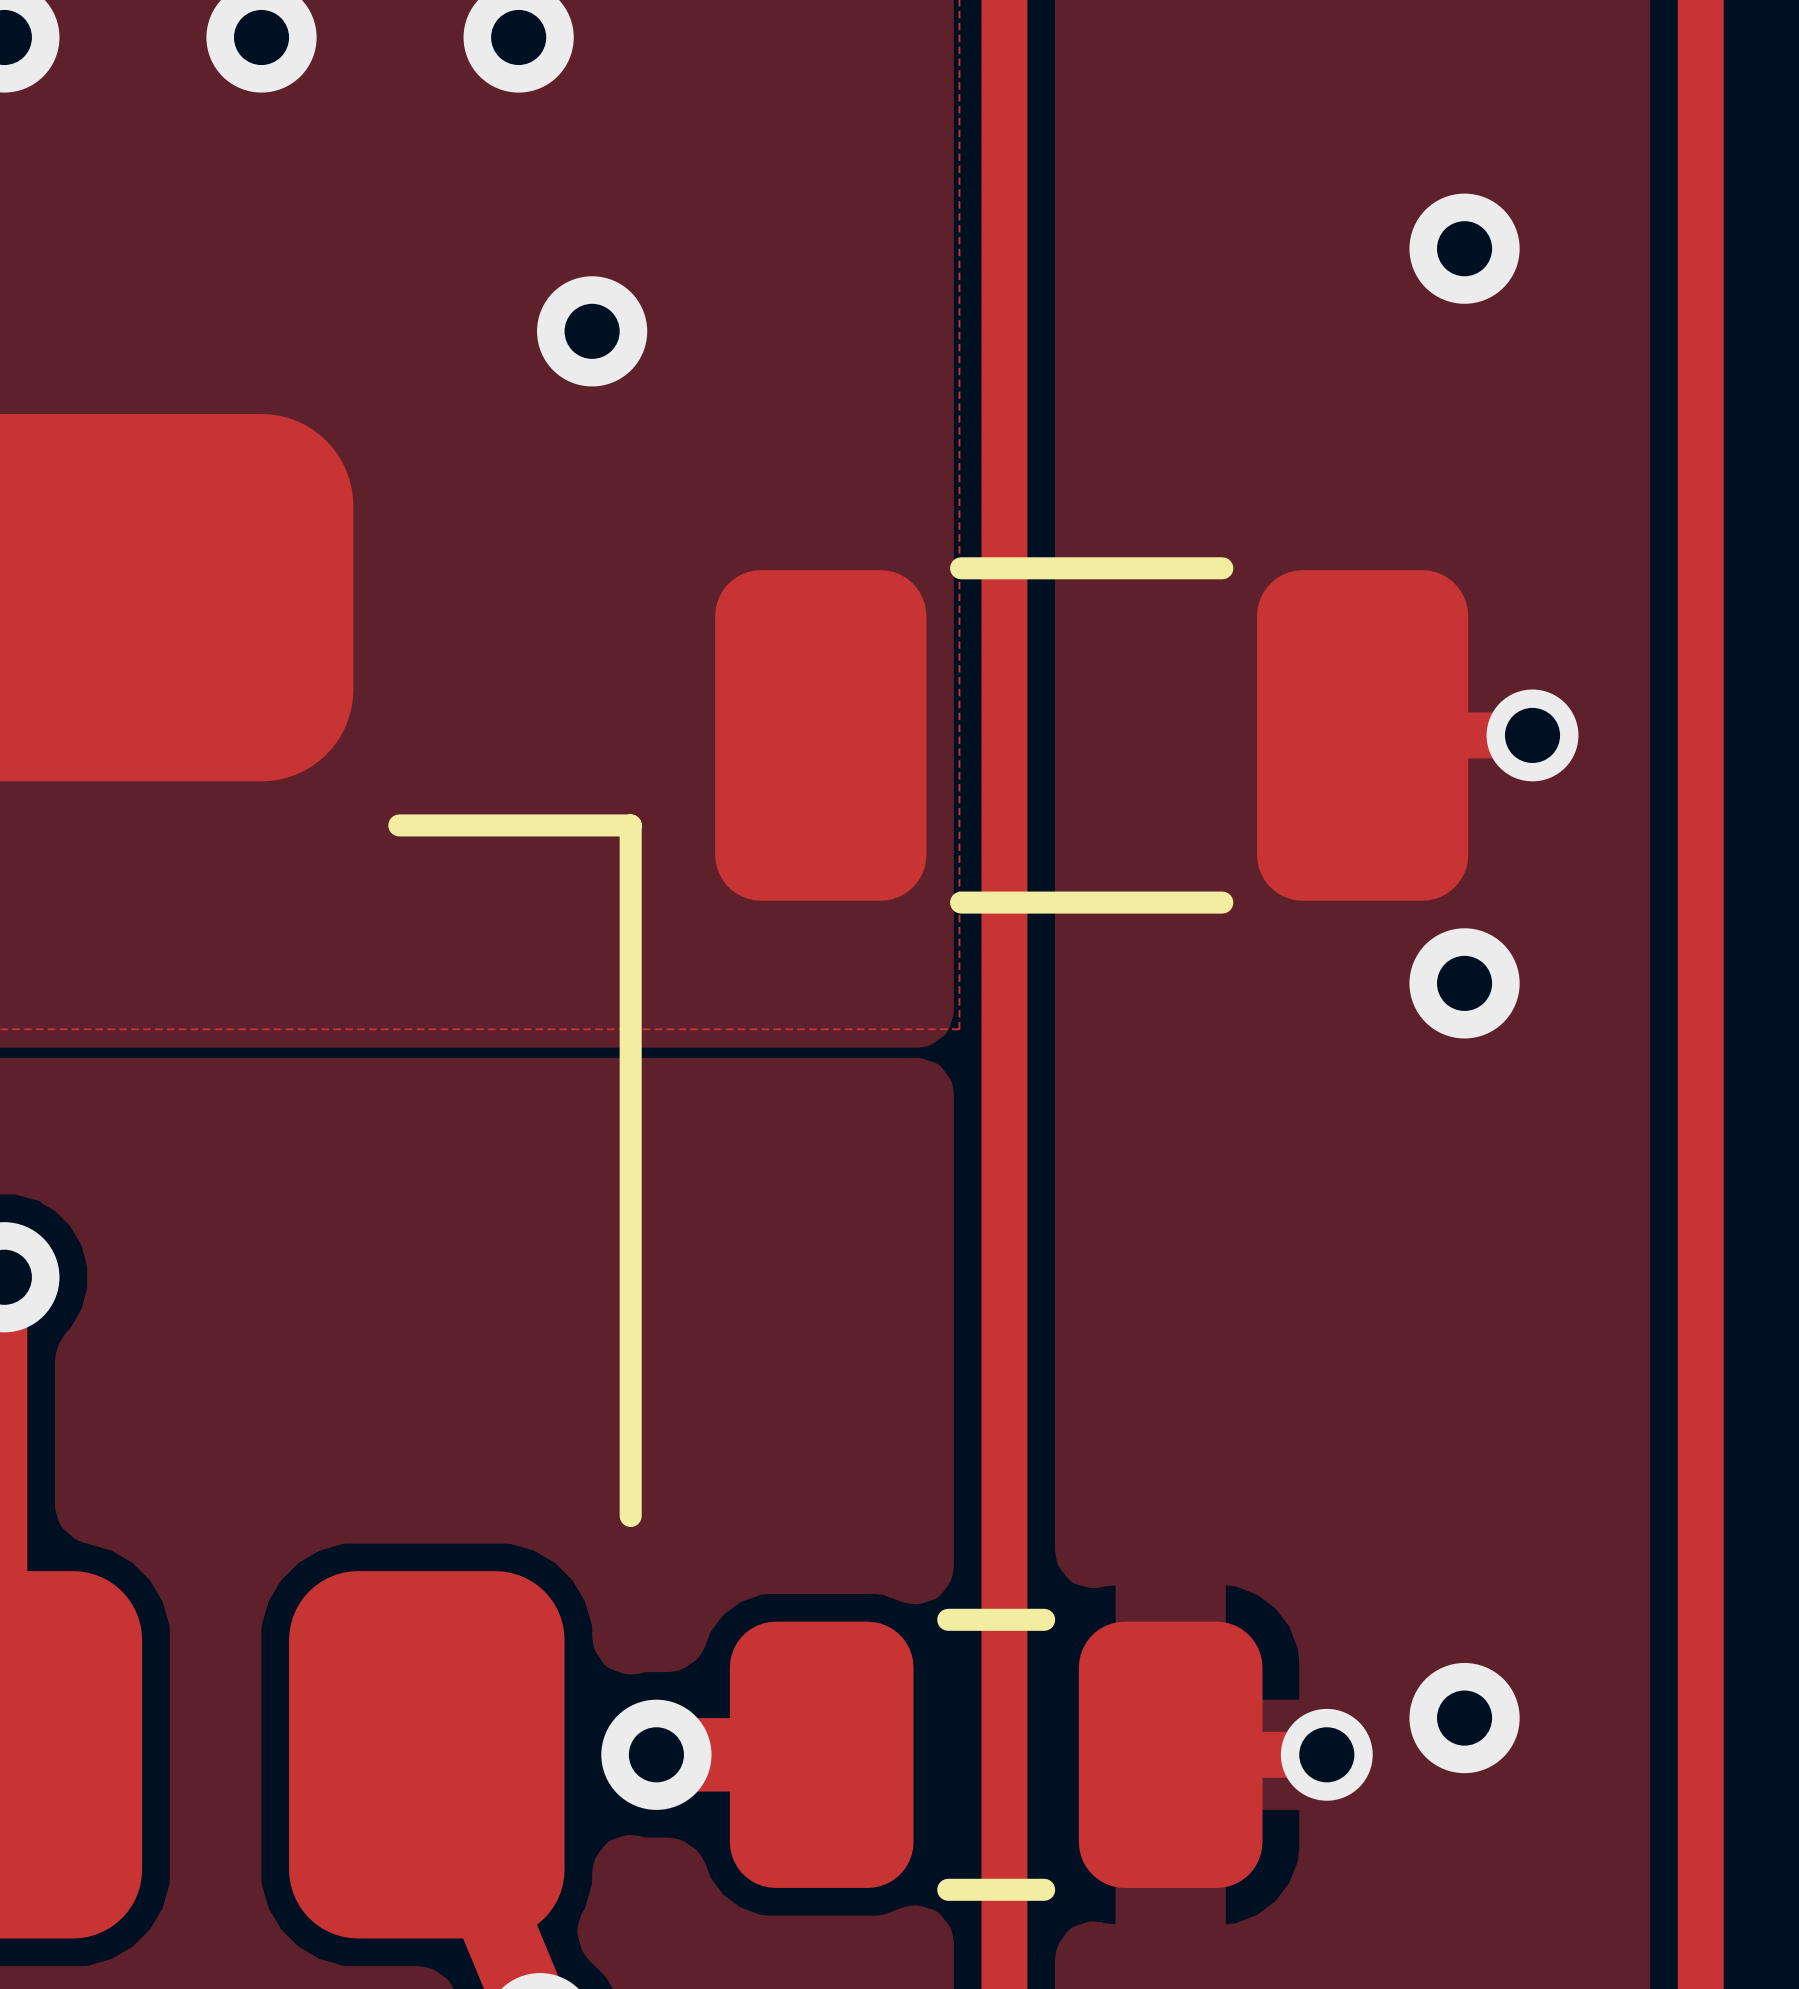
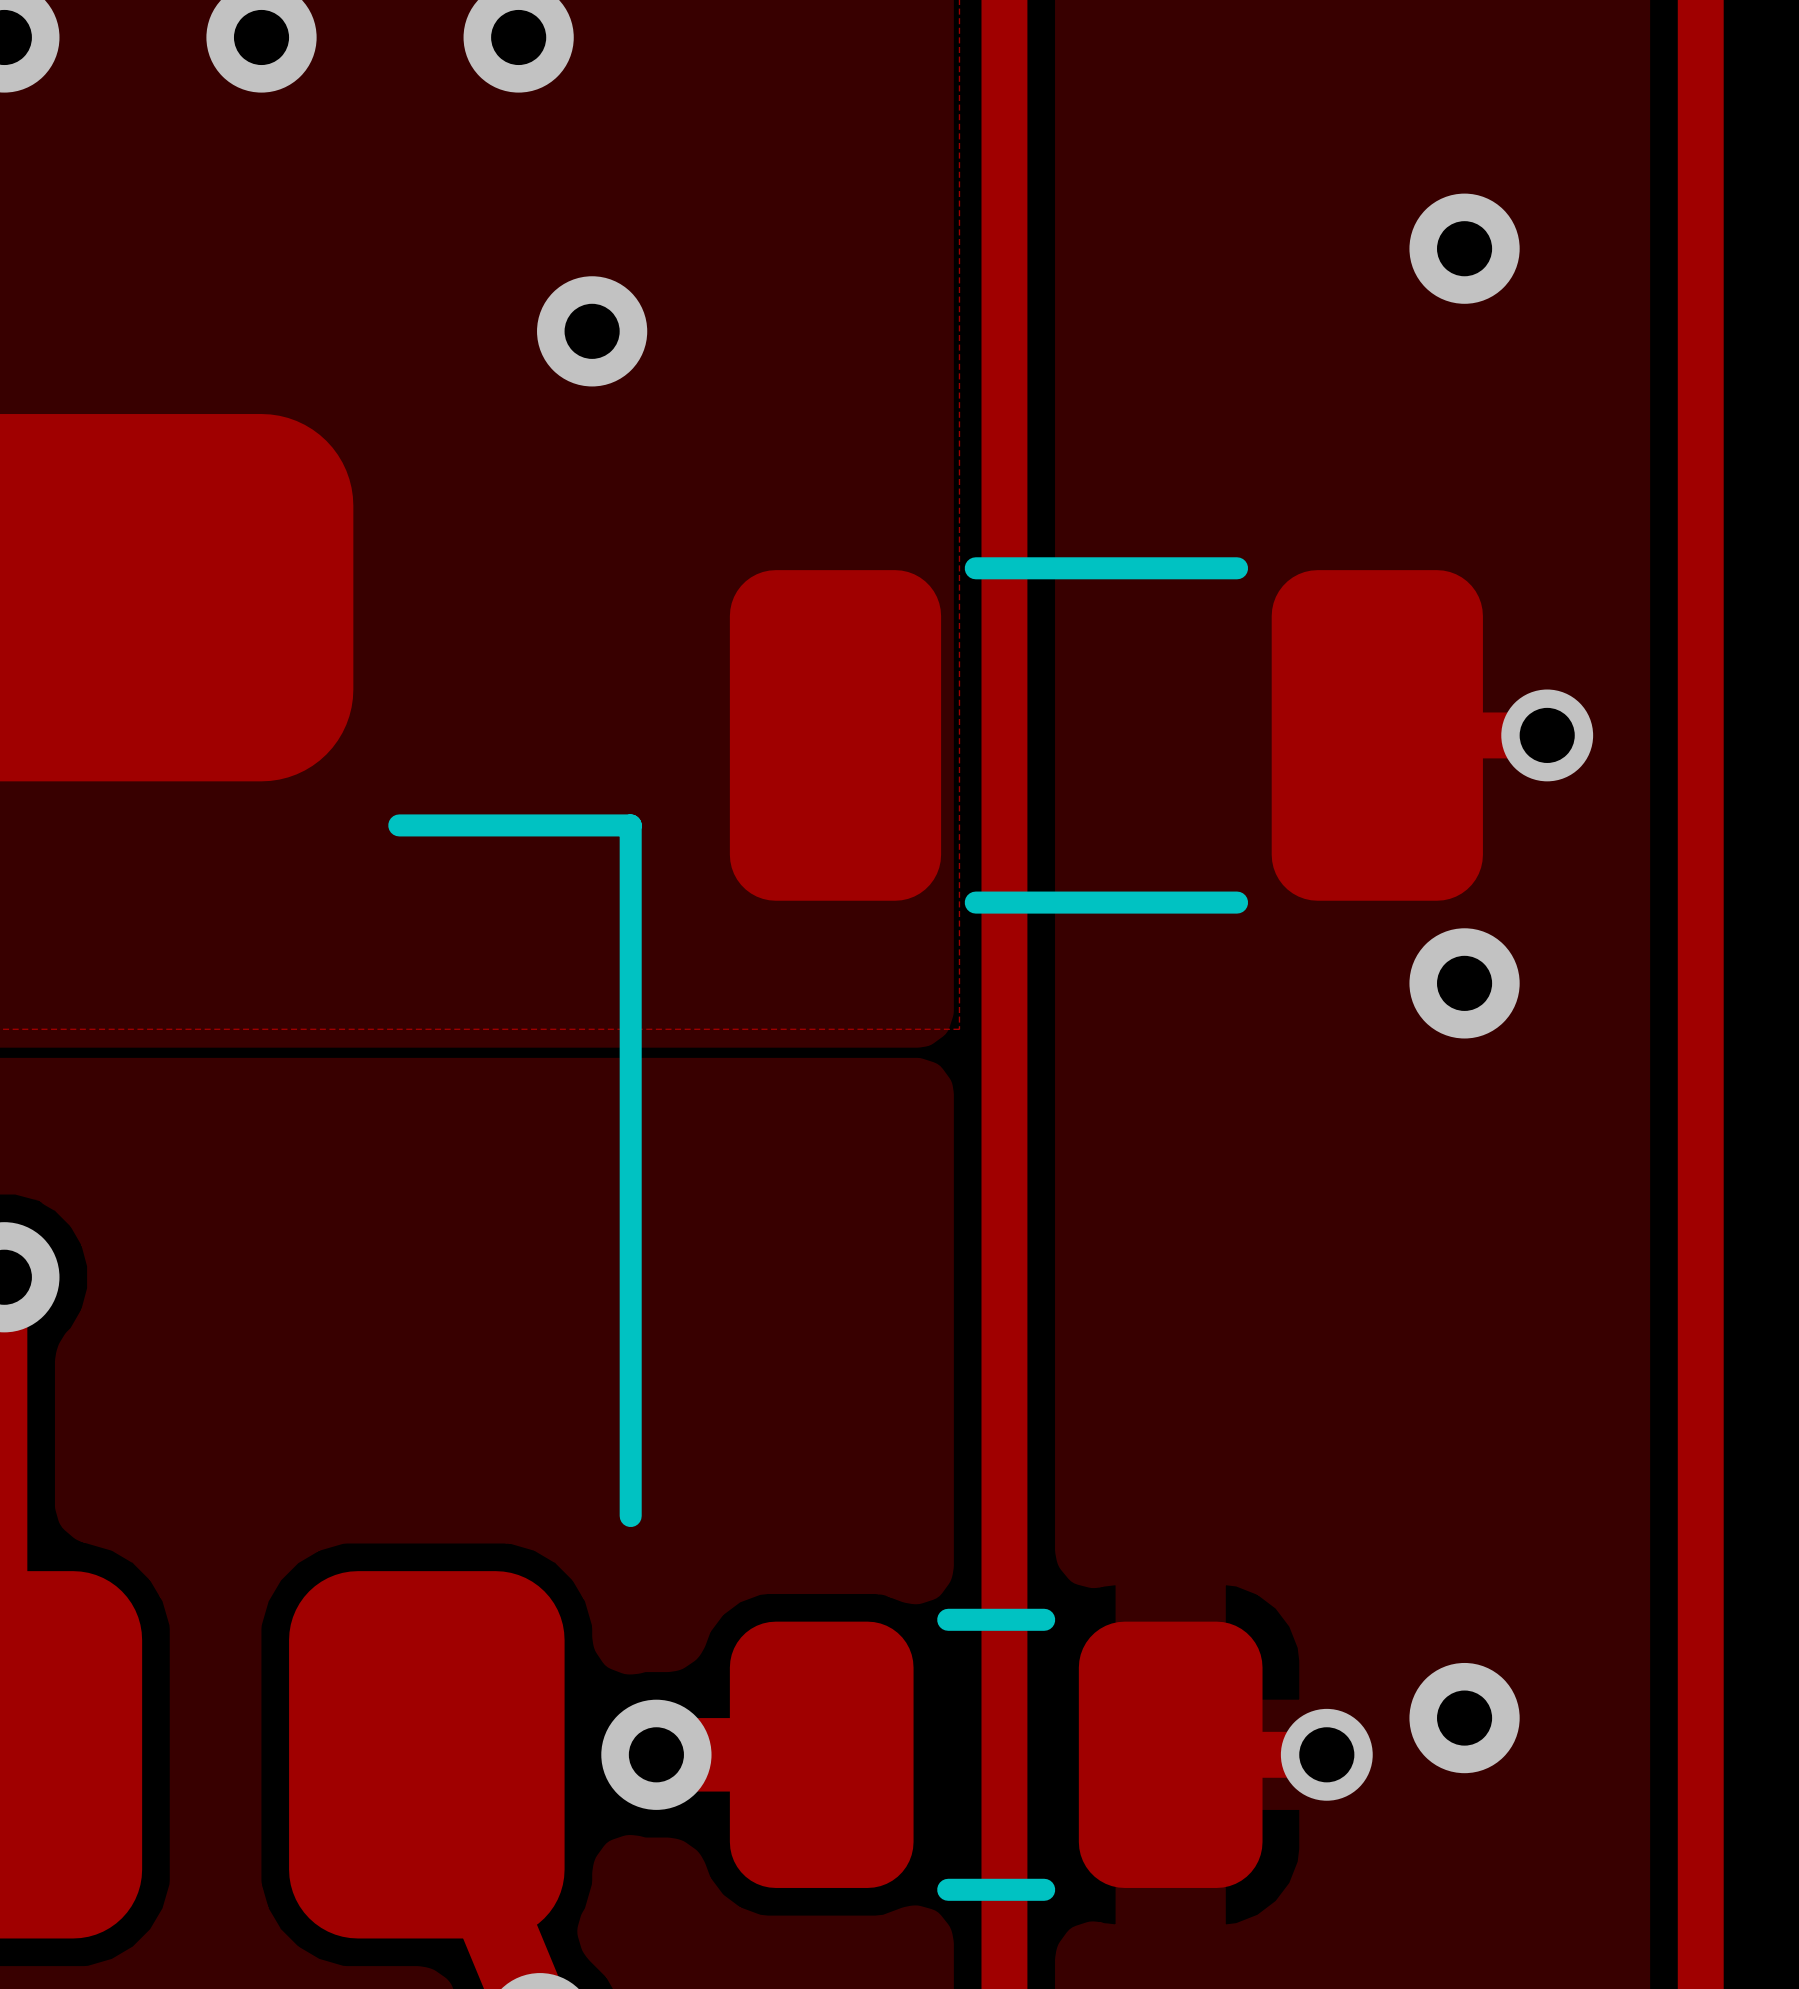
part position: (1091, 735) -> (1106, 735)
via position: (1532, 735) -> (1547, 735)

